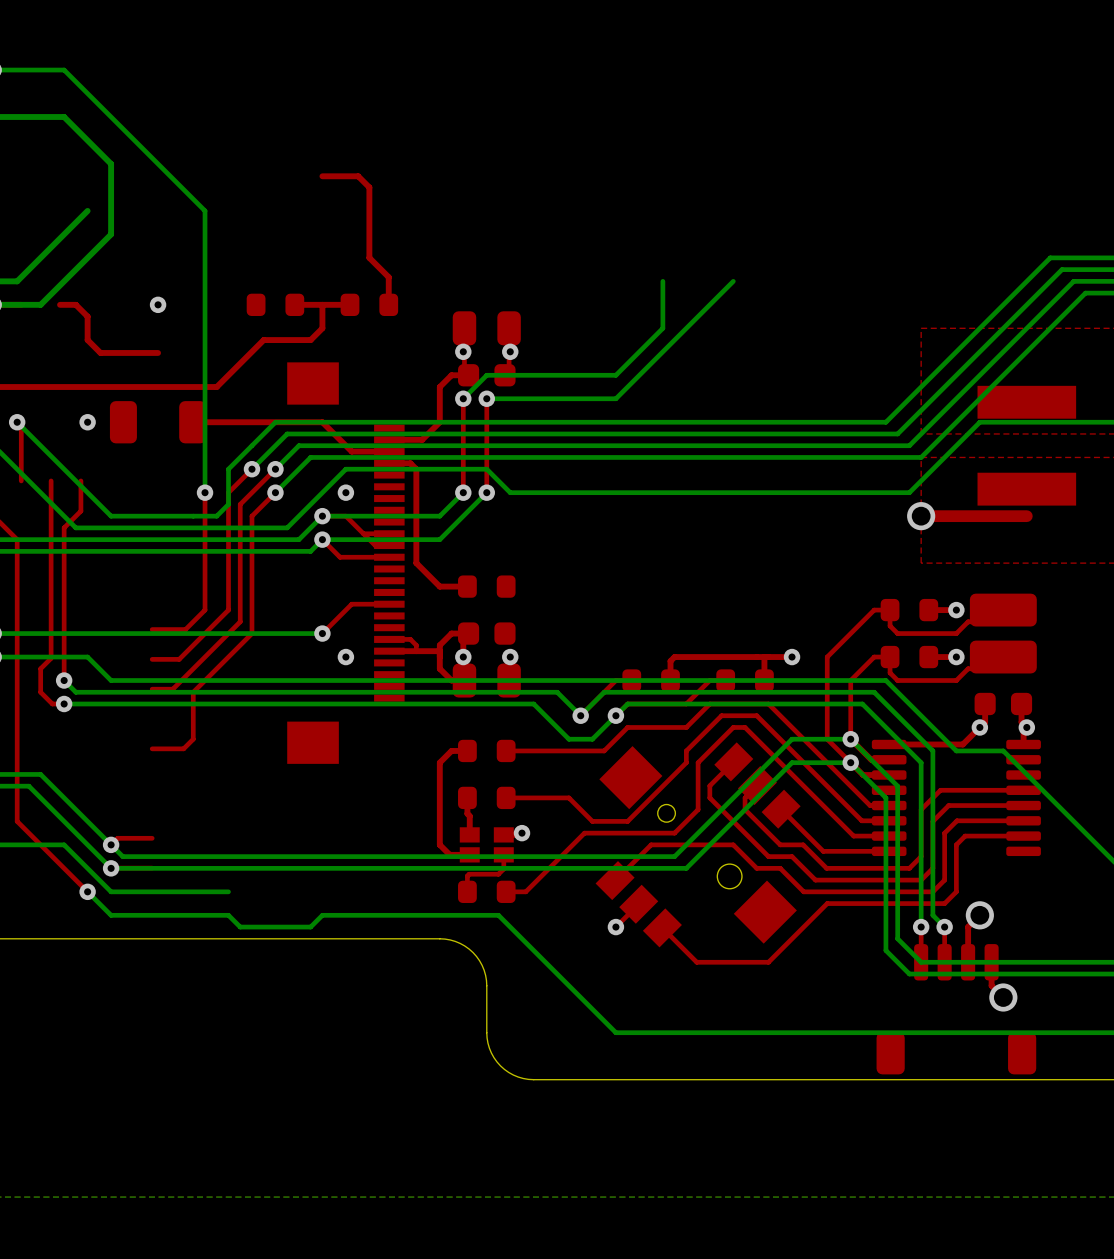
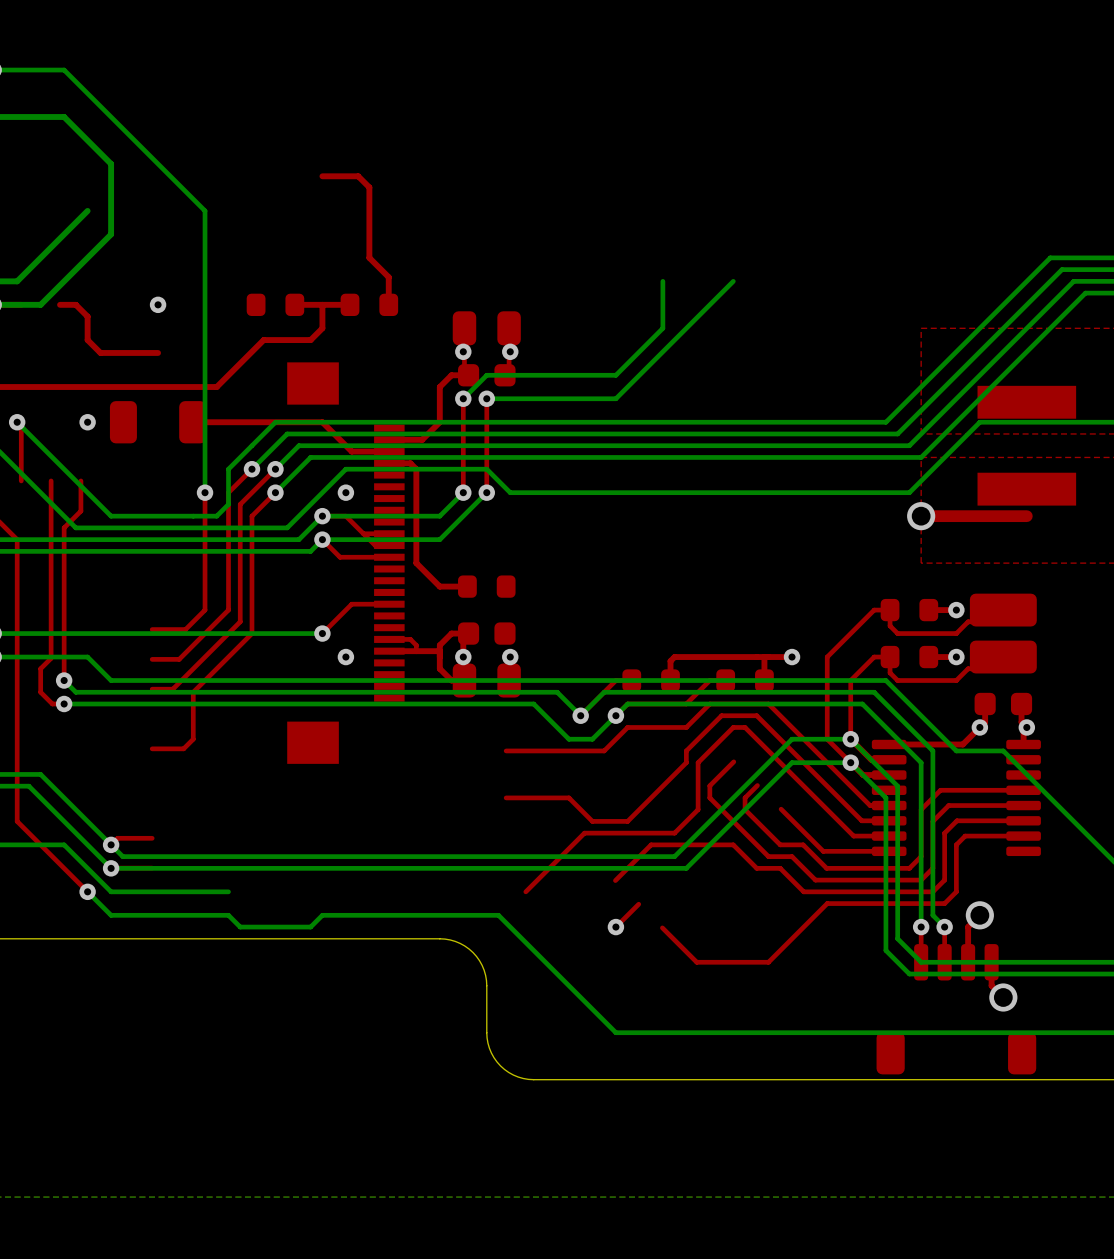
top track: (467, 750) (451, 750) (439, 762) (439, 844) (449, 854) (469, 854) -> none
part: (486, 750) -> none
top track: (467, 797) (469, 834) -> none
part: (486, 797) -> none
via: (522, 833) -> none
part: (486, 844) -> none
part: (698, 844) -> none
top track: (503, 854) (503, 868) (498, 874) (469, 874) (467, 875) (467, 891) -> none
part: (486, 891) -> none
top track: (525, 891) (506, 891) -> none

